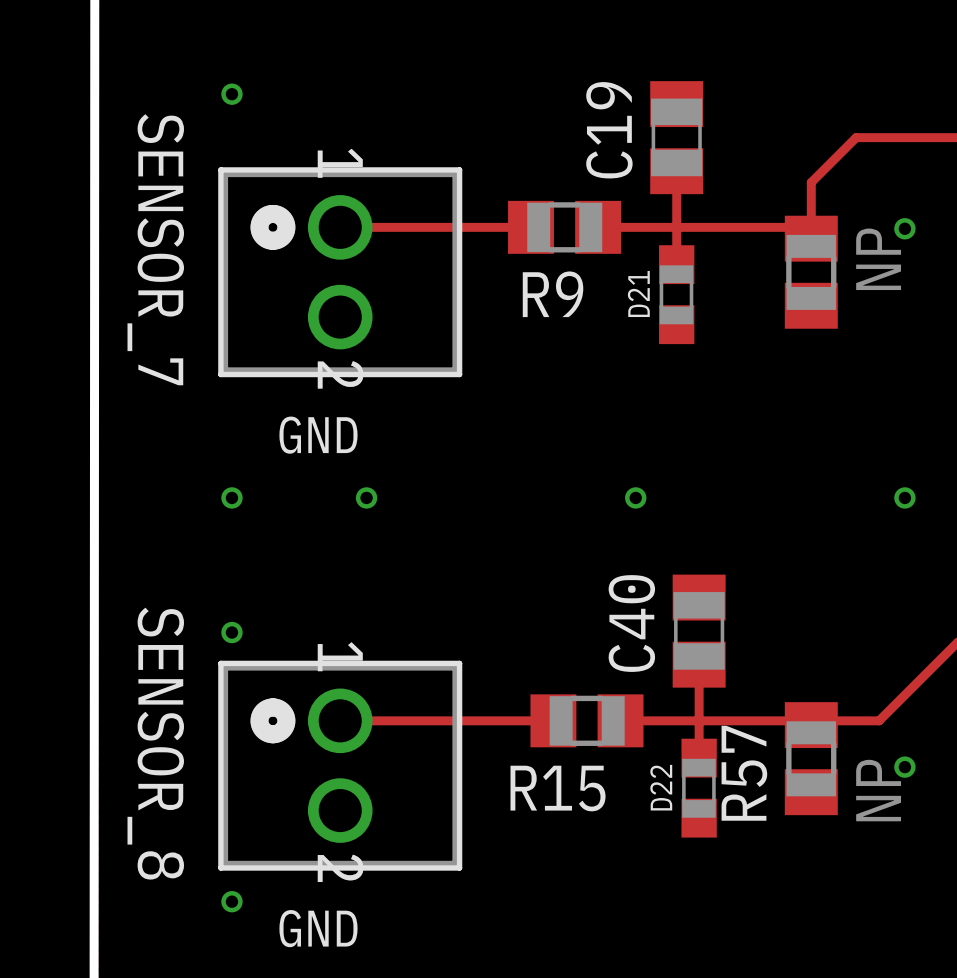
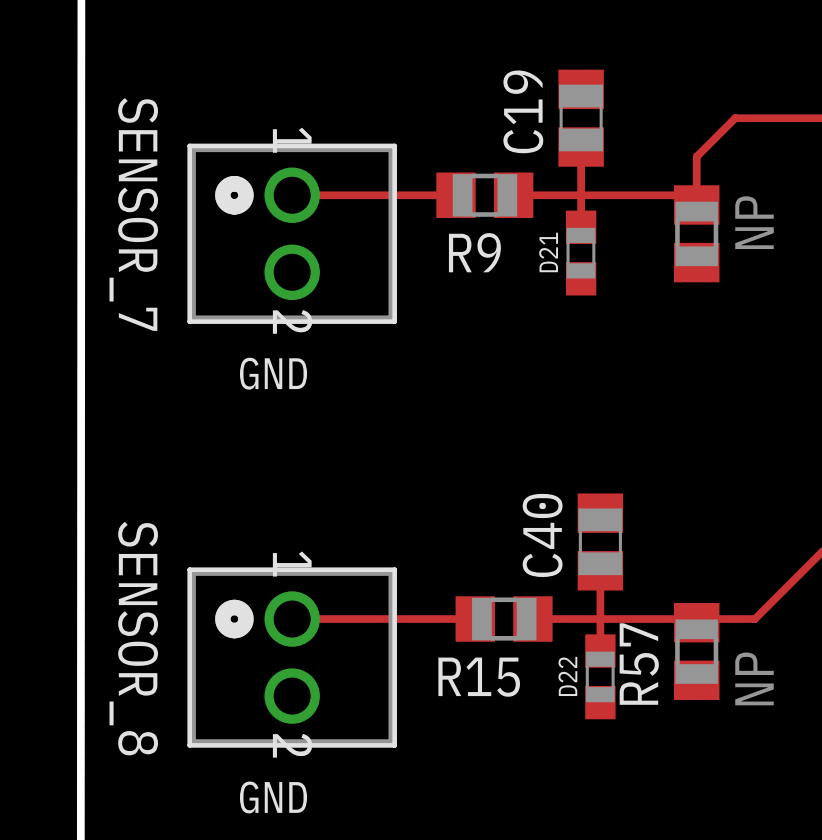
via: (231, 94) -> none
via: (904, 228) -> none
via: (231, 497) -> none
via: (366, 497) -> none
via: (635, 497) -> none
via: (904, 497) -> none
via: (231, 632) -> none
via: (904, 767) -> none
via: (231, 901) -> none

